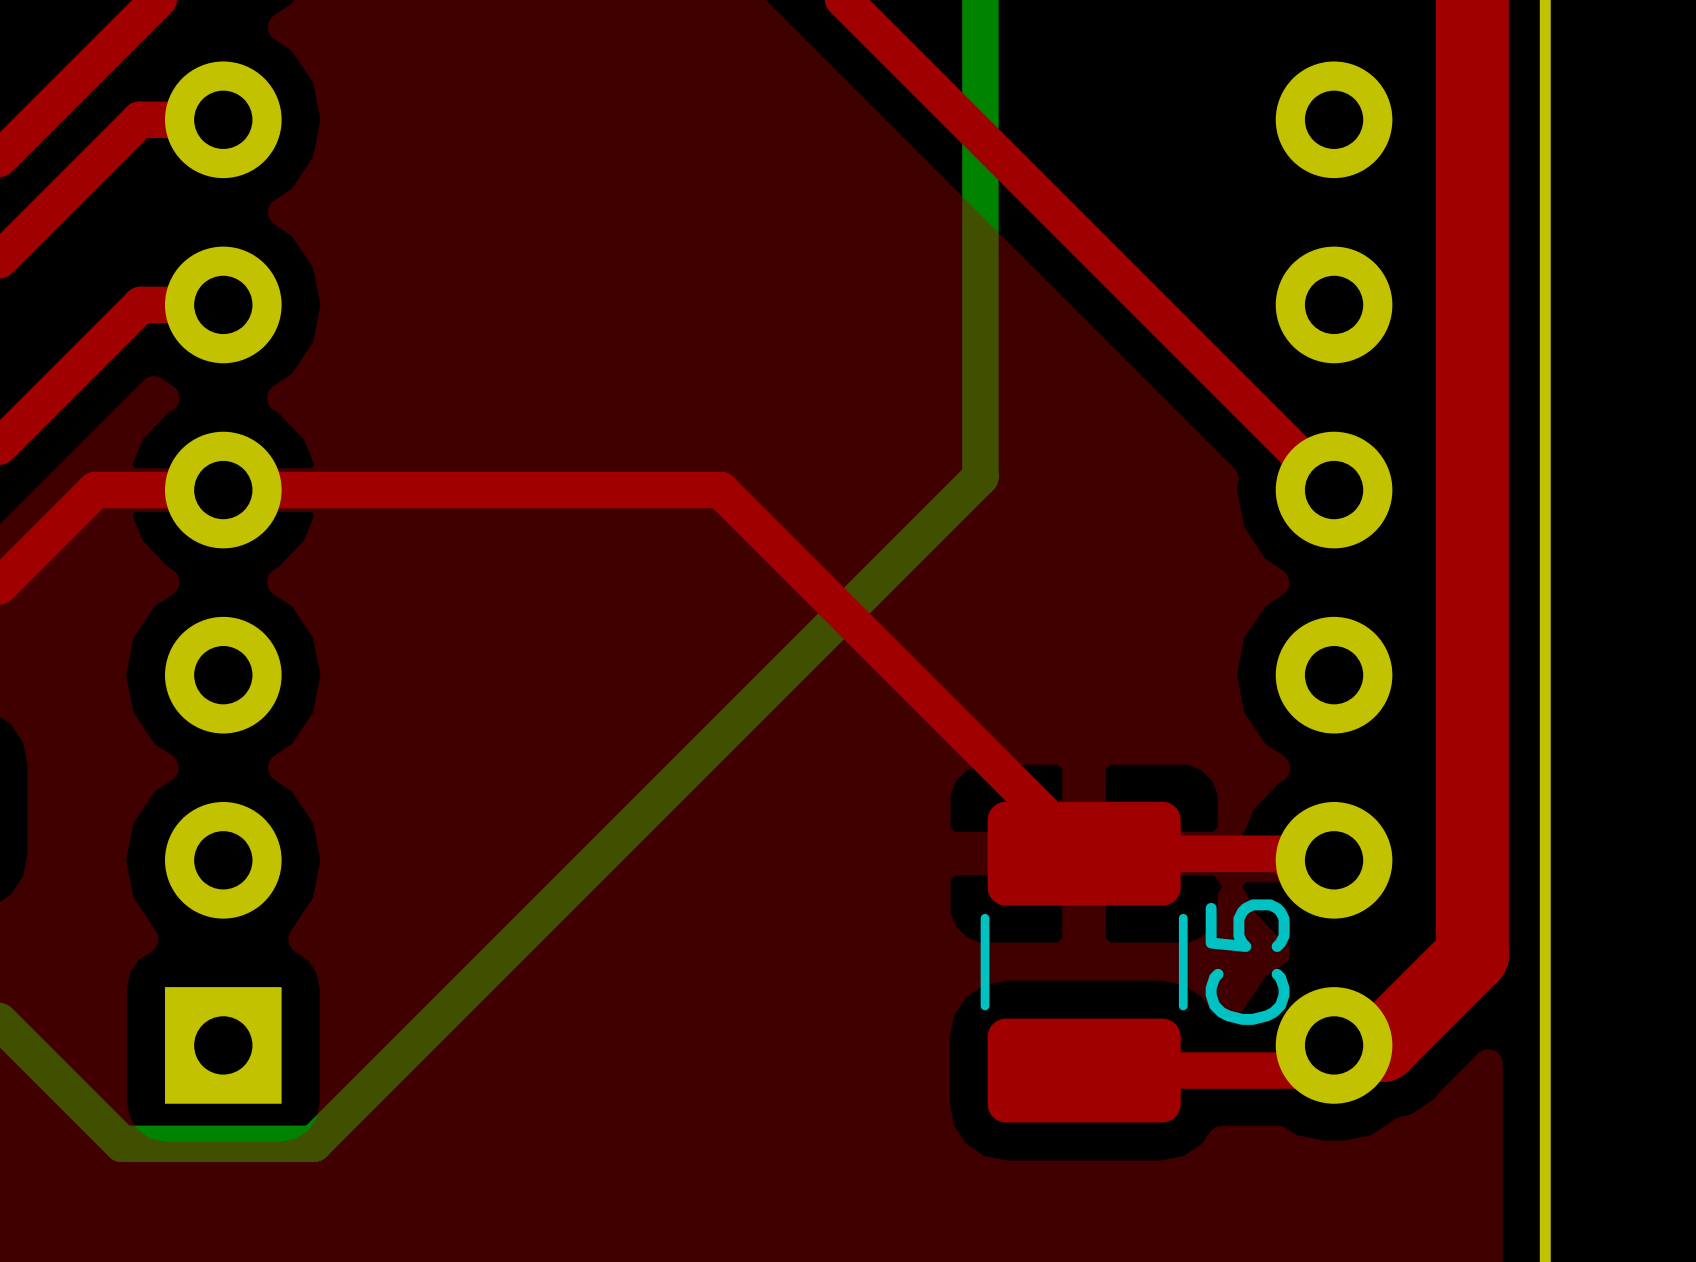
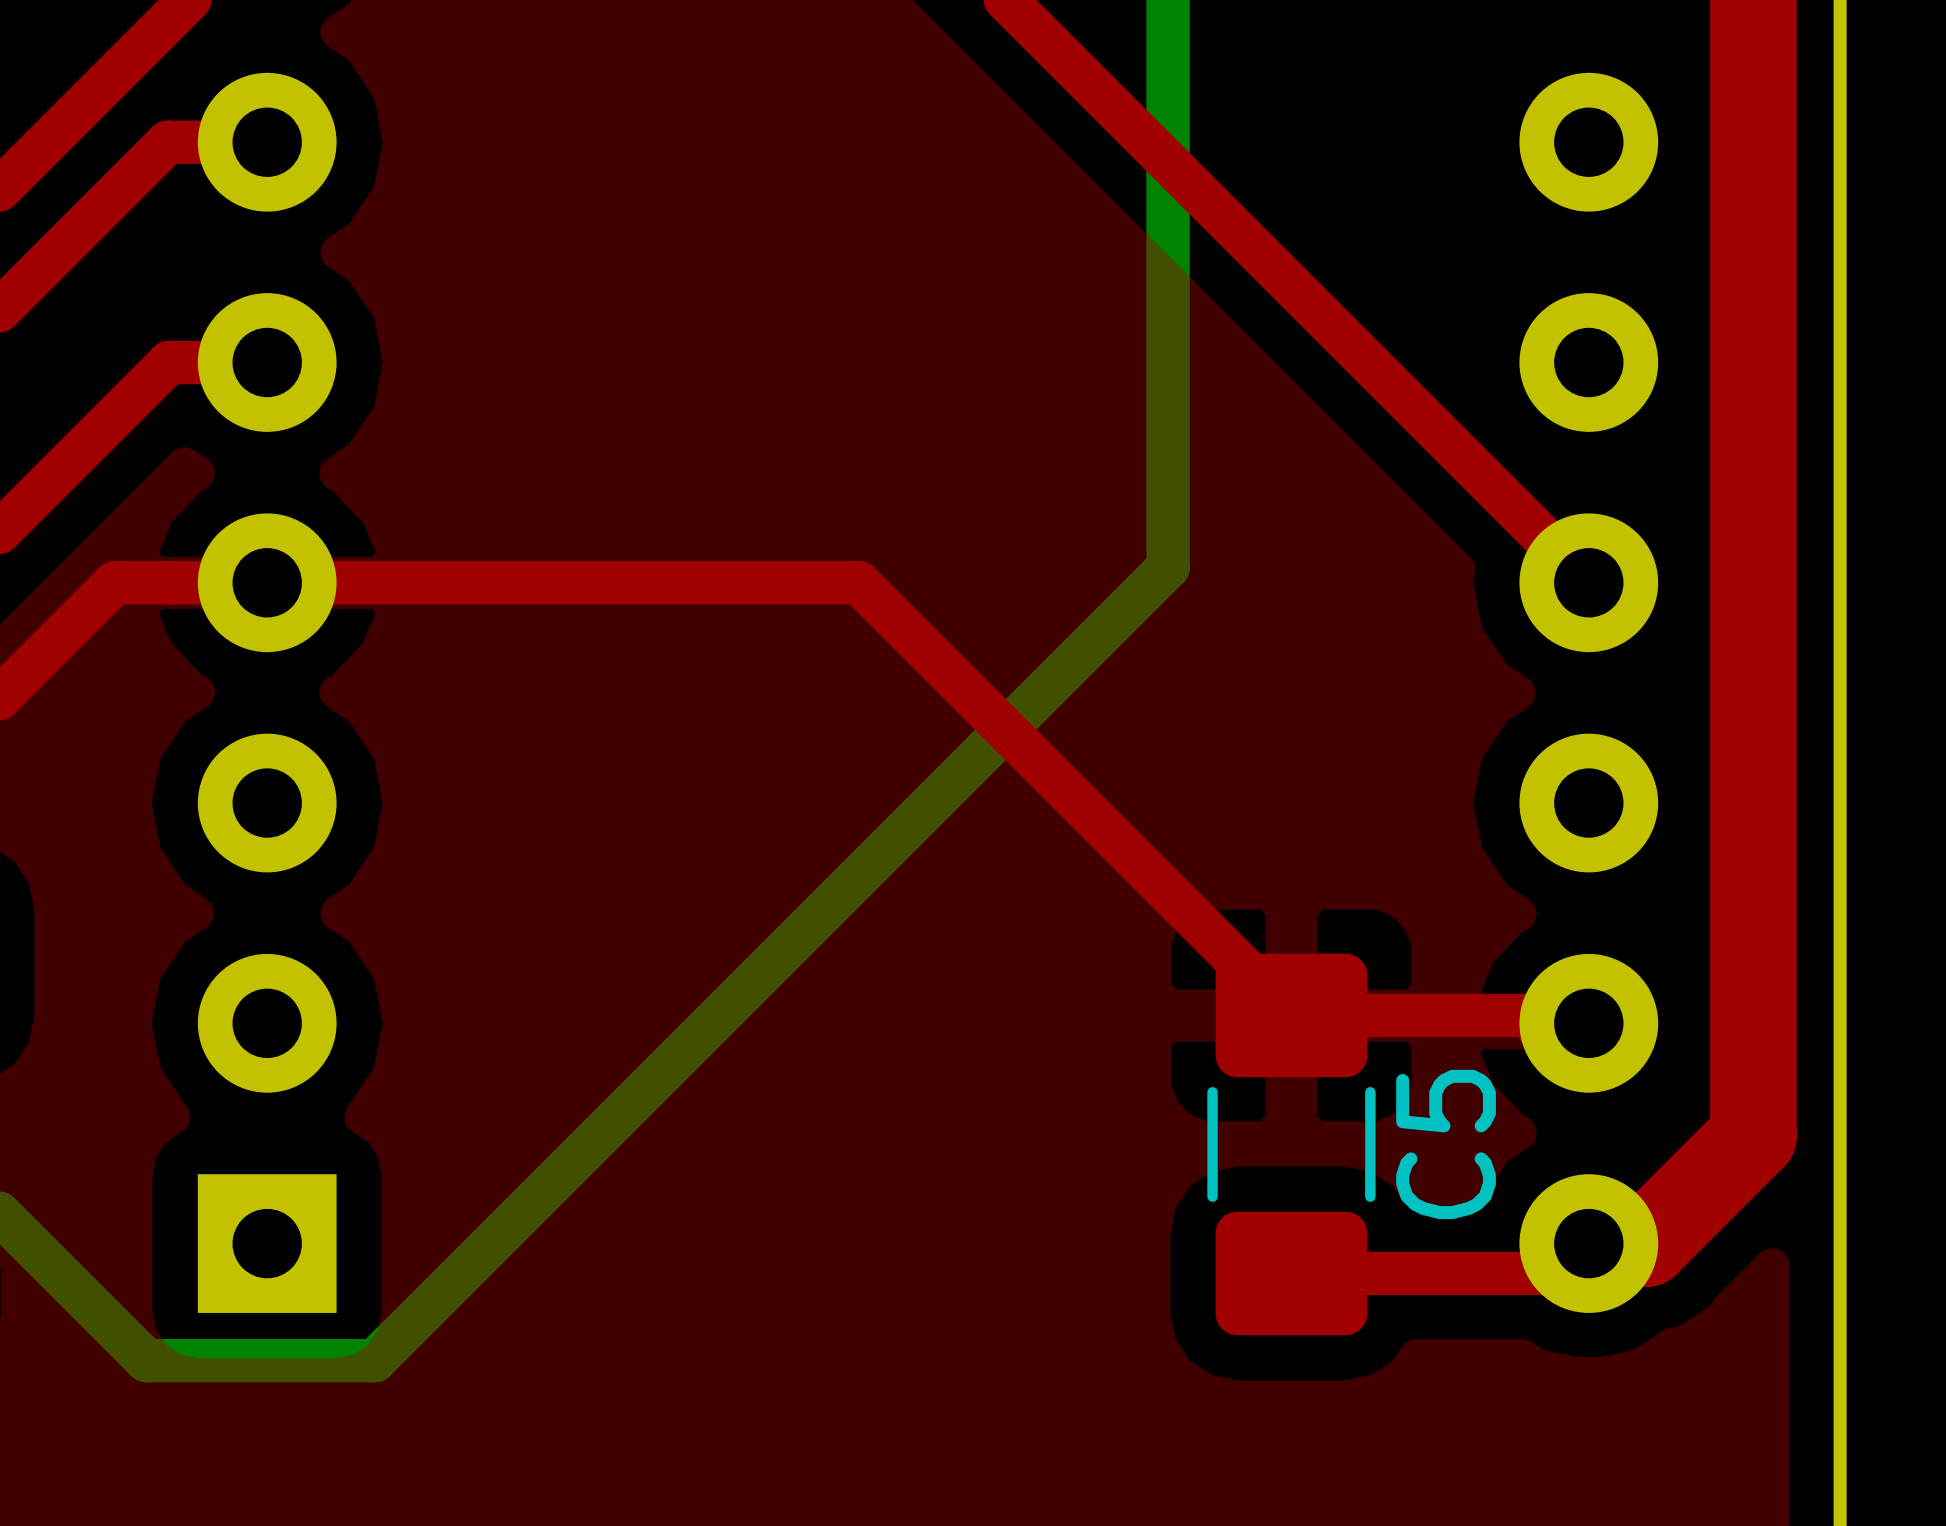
C5 footprint: [980, 801, 1188, 1123] -> [1207, 953, 1376, 1336]
C5 name position: C5 (1247, 962) -> C5 (1446, 1144)

